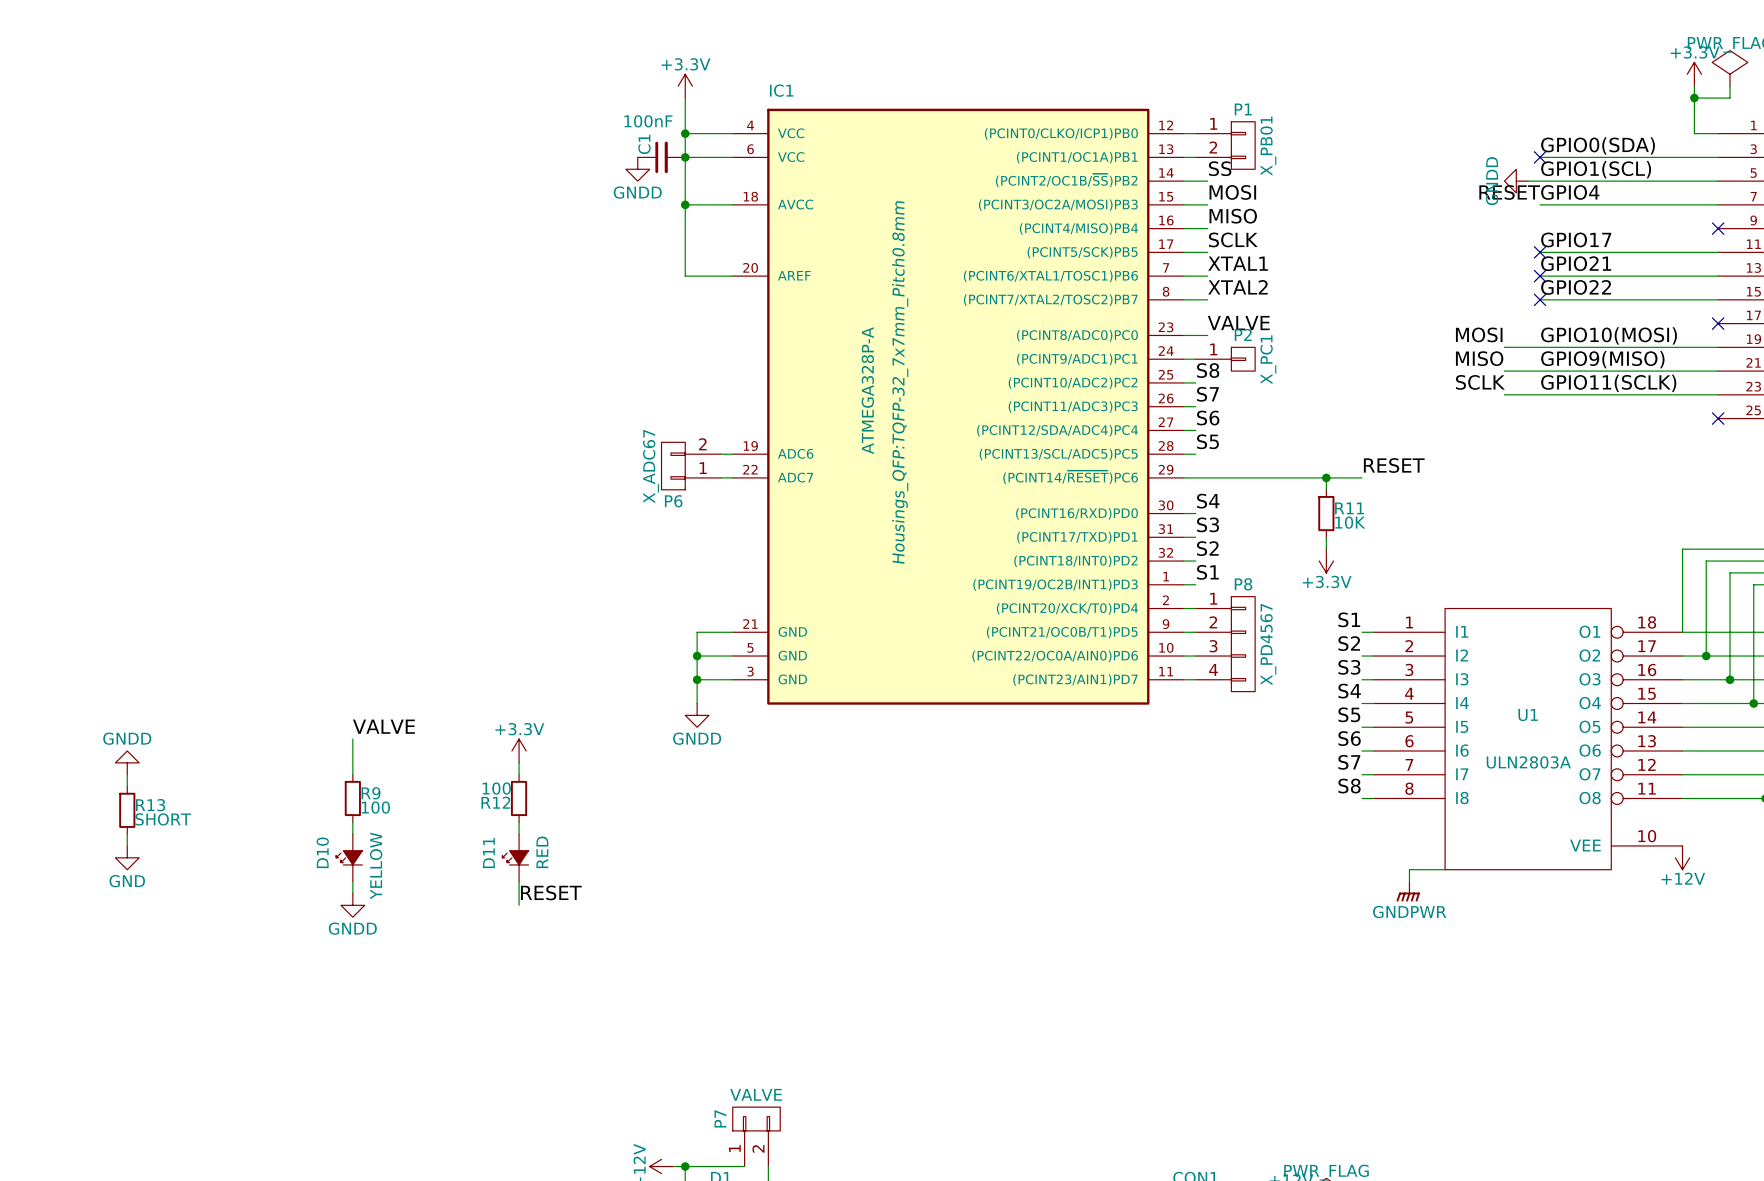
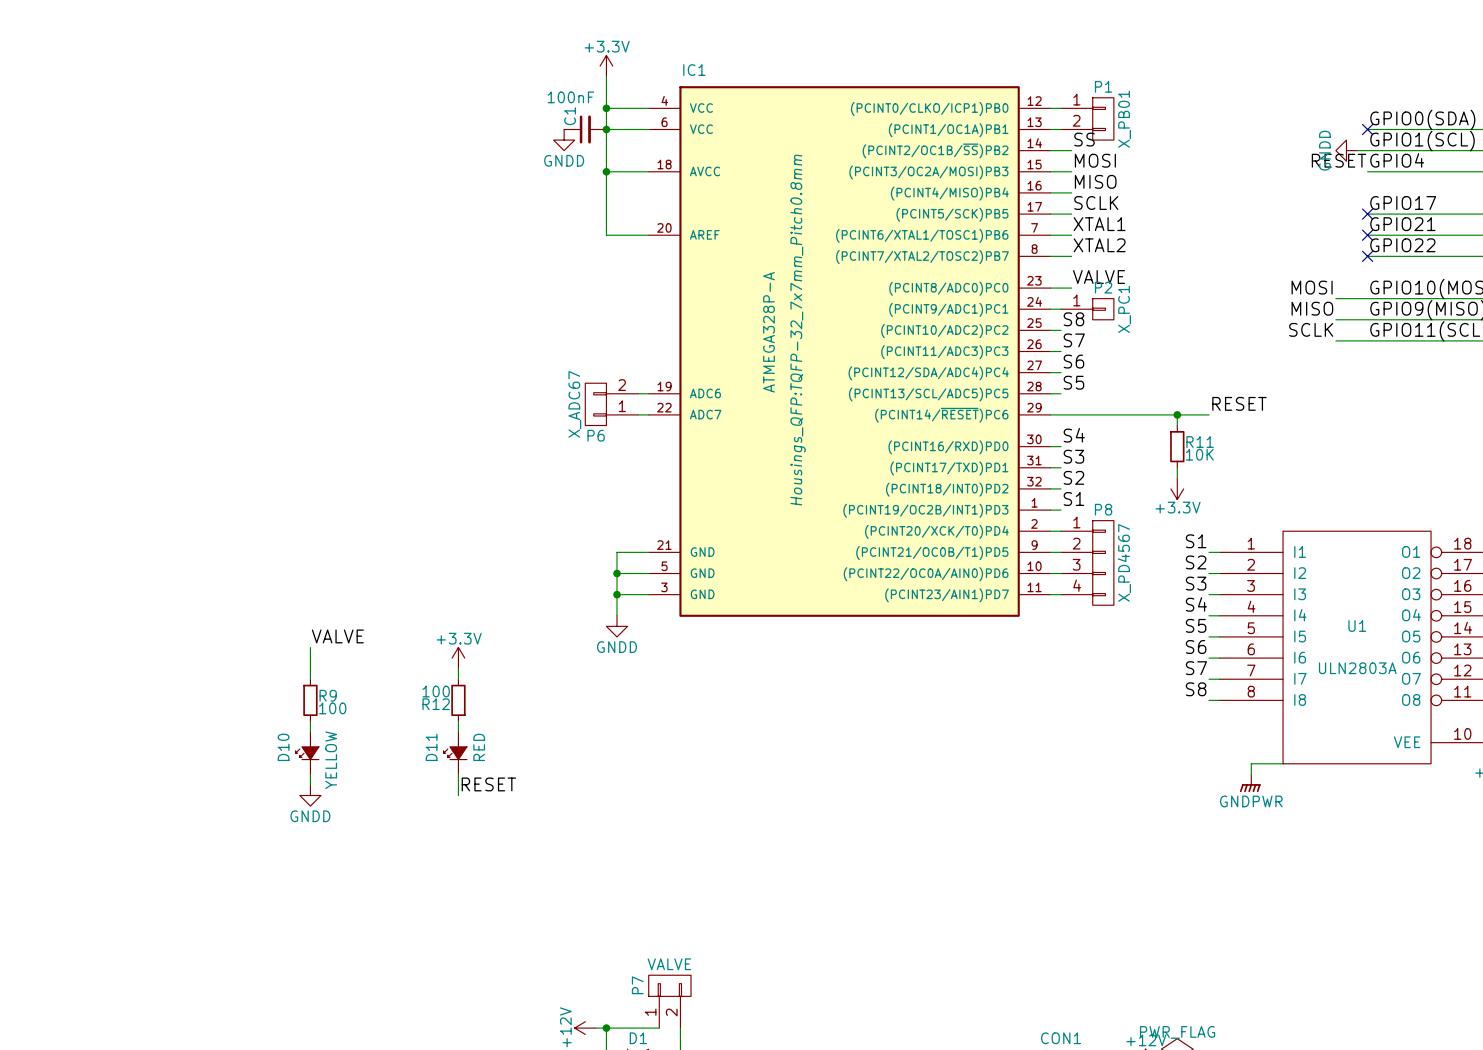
power symbol: GNDD (127, 762) -> none
wire: (127, 774) (127, 786) -> none
R13: SHORT (127, 810) -> none
wire: (127, 834) (127, 845) -> none
power symbol: GND (127, 857) -> none

